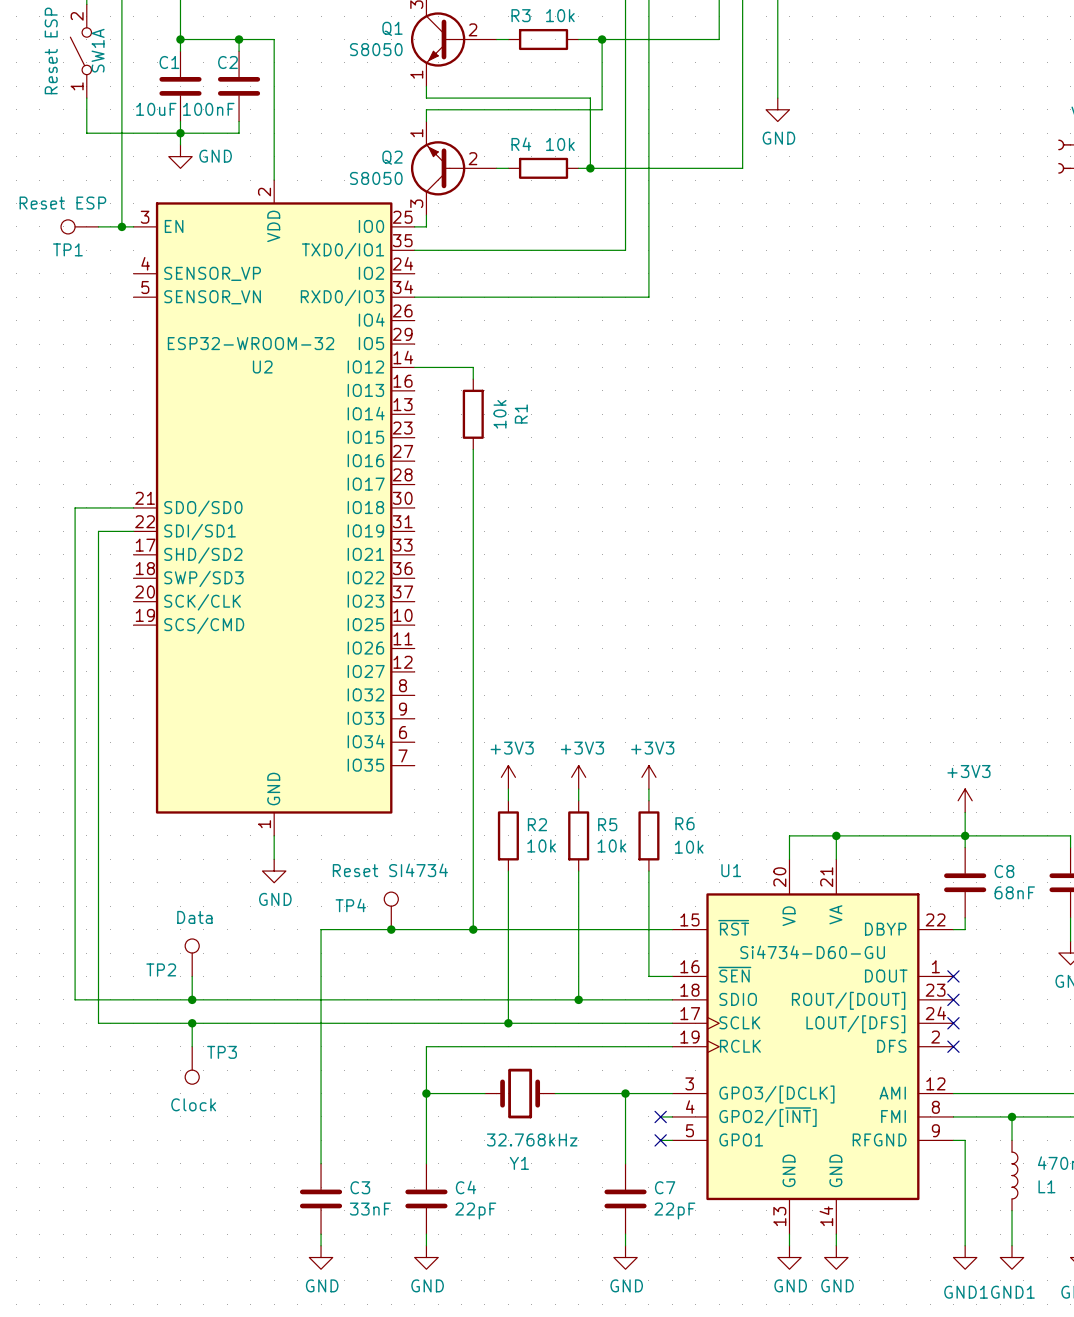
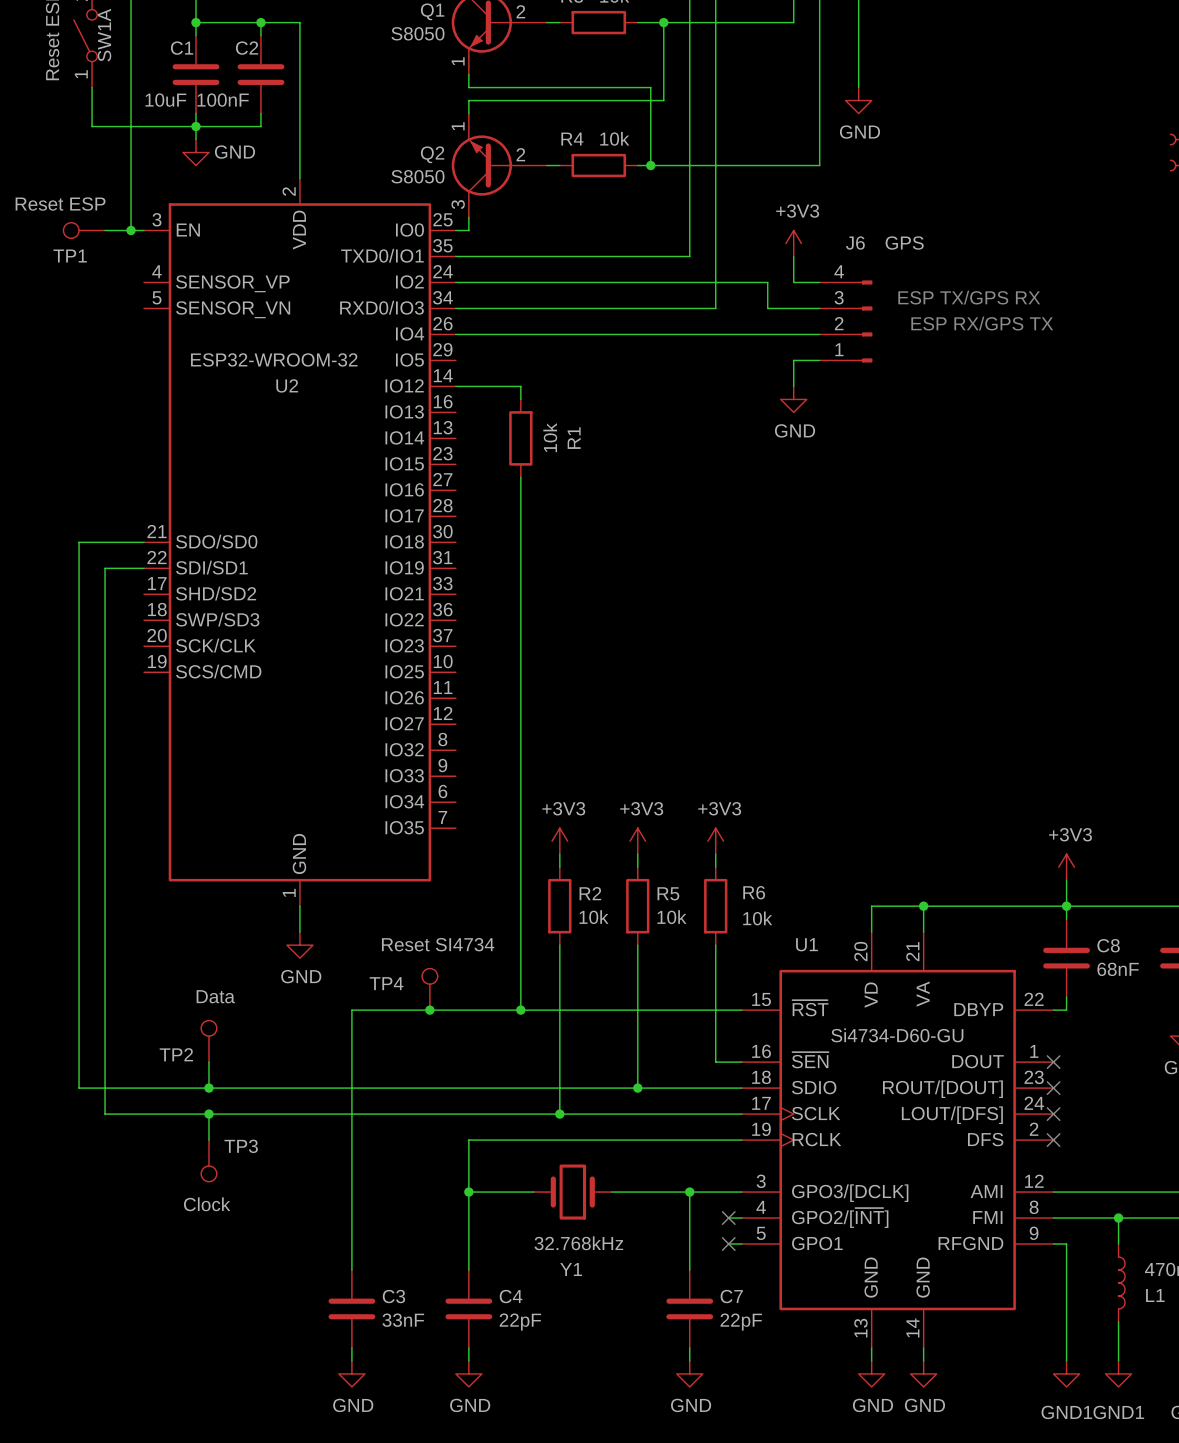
power symbol: none -> +3V3 (793, 243)
wire: none -> (793, 256) (793, 282) (819, 282)
wire: none -> (455, 282) (767, 282) (767, 308) (819, 308)
text: none -> ESP TX/GPS RX (969, 297)
J6: none -> GPS (846, 321)
text: none -> ESP RX/GPS TX (982, 323)
wire: none -> (455, 334) (819, 334)
wire: none -> (819, 360) (793, 360) (793, 386)
power symbol: none -> GND (793, 399)

